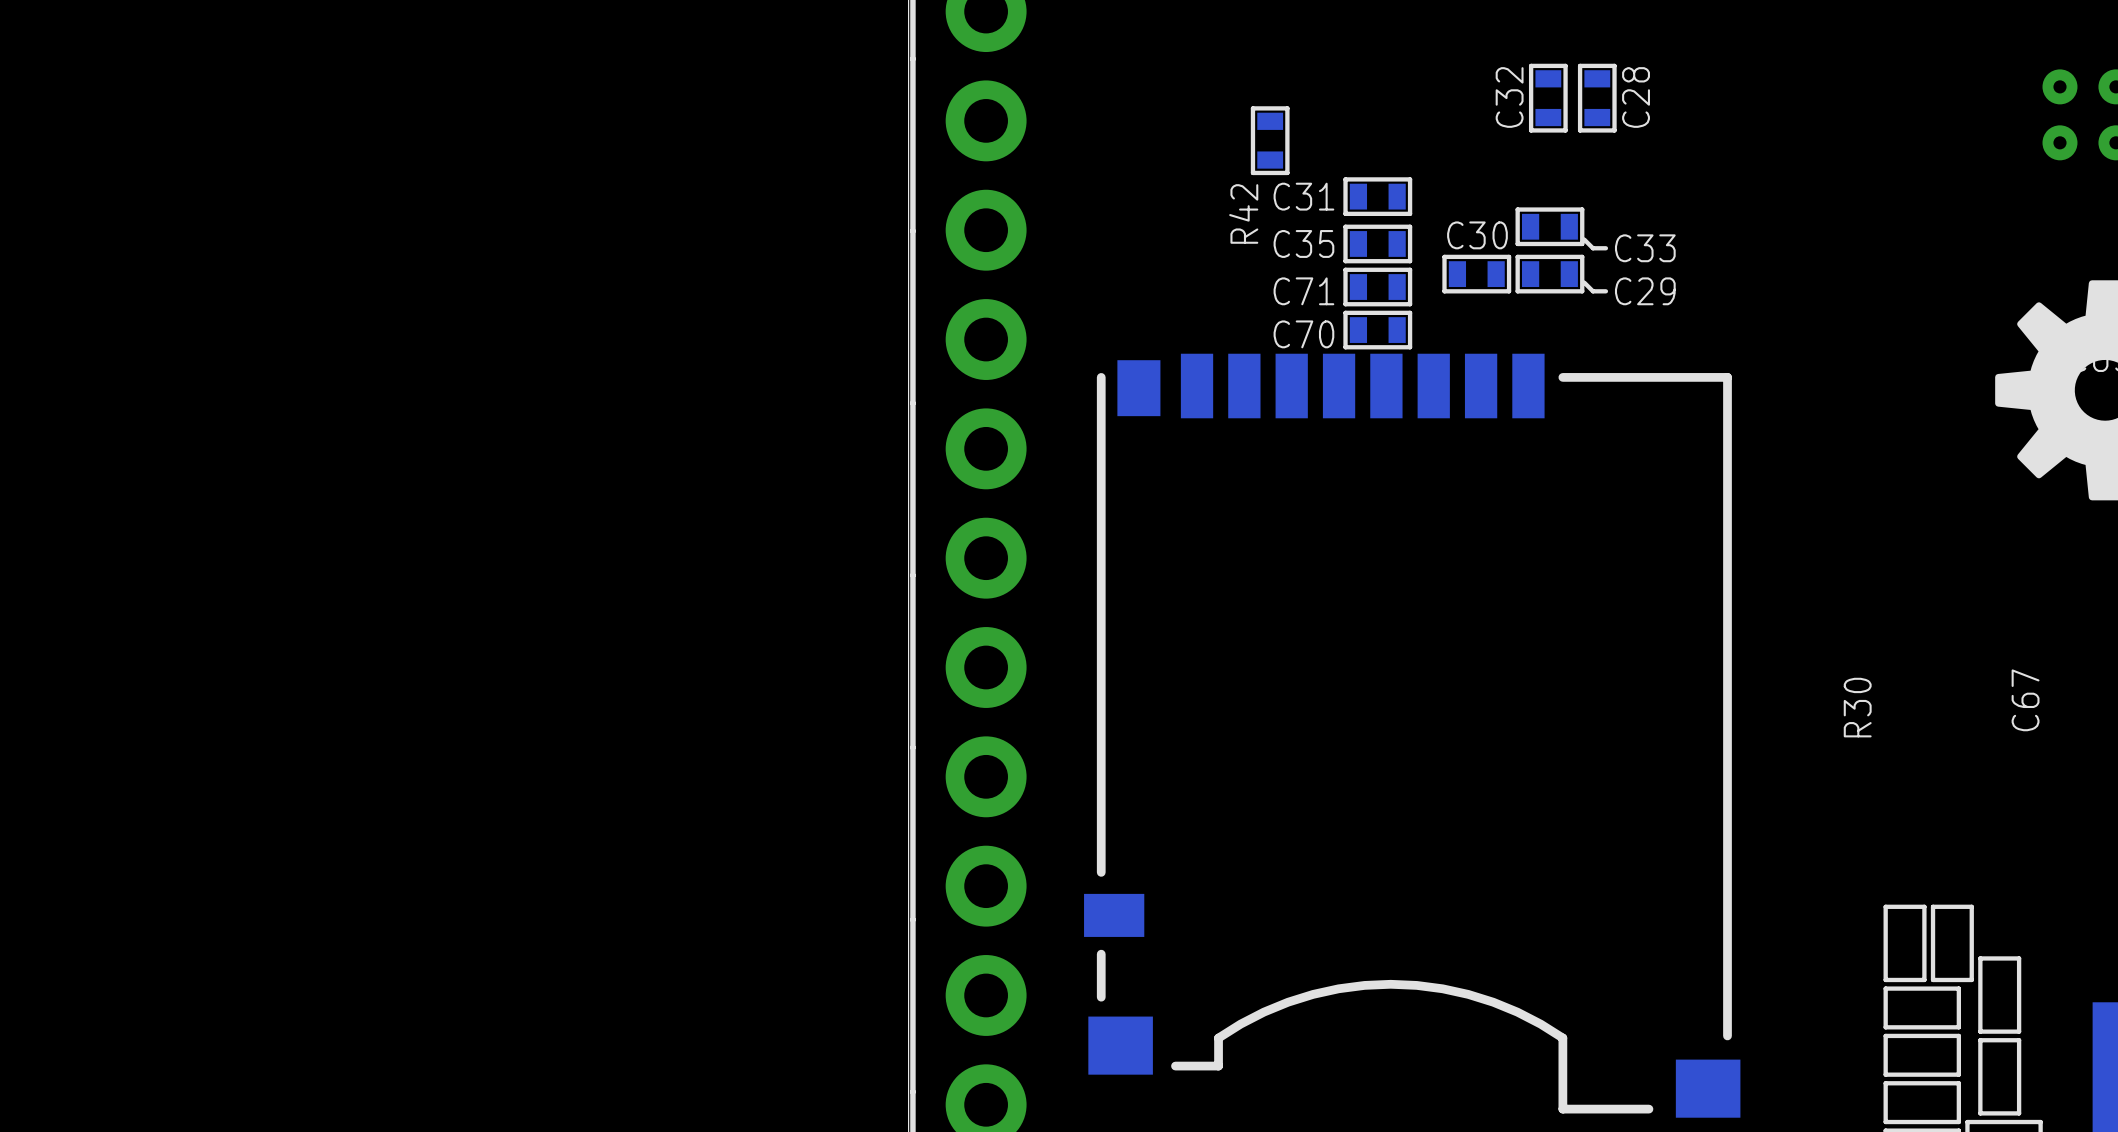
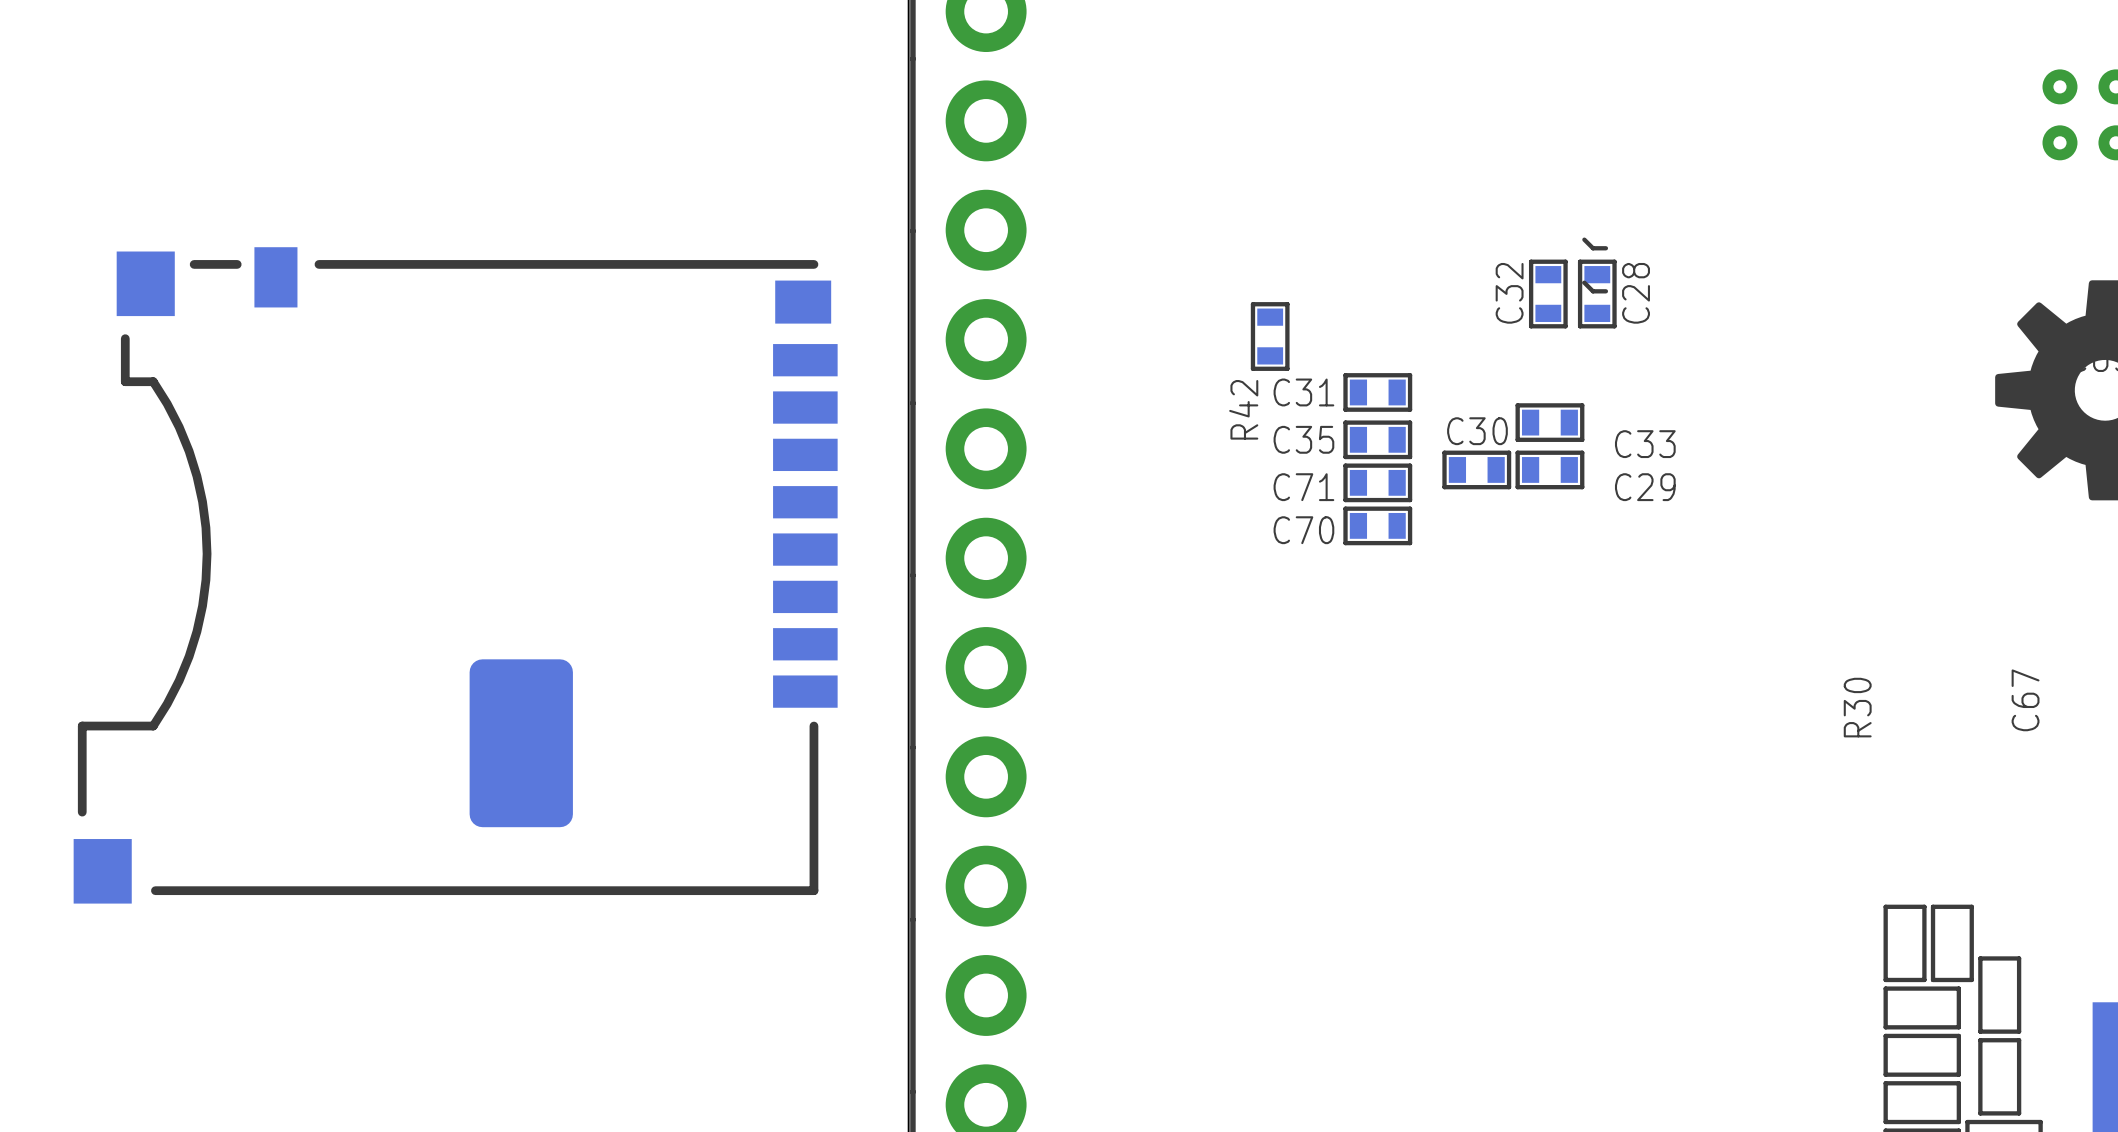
C32 position: (1548, 98) -> (1548, 294)
C28 position: (1597, 98) -> (1597, 294)
R42 position: (1270, 140) -> (1270, 336)
C31 position: (1377, 196) -> (1377, 392)
C33 position: (1549, 226) -> (1549, 422)
C35 position: (1377, 243) -> (1377, 439)
C30 position: (1476, 274) -> (1476, 469)
C29 position: (1549, 274) -> (1549, 469)
C71 position: (1377, 287) -> (1377, 482)
C70 position: (1377, 330) -> (1377, 525)
part rotation: 0° (1412, 735) -> 90° clockwise (455, 575)
part position: (1412, 735) -> (455, 575)
part: none -> (521, 743)

